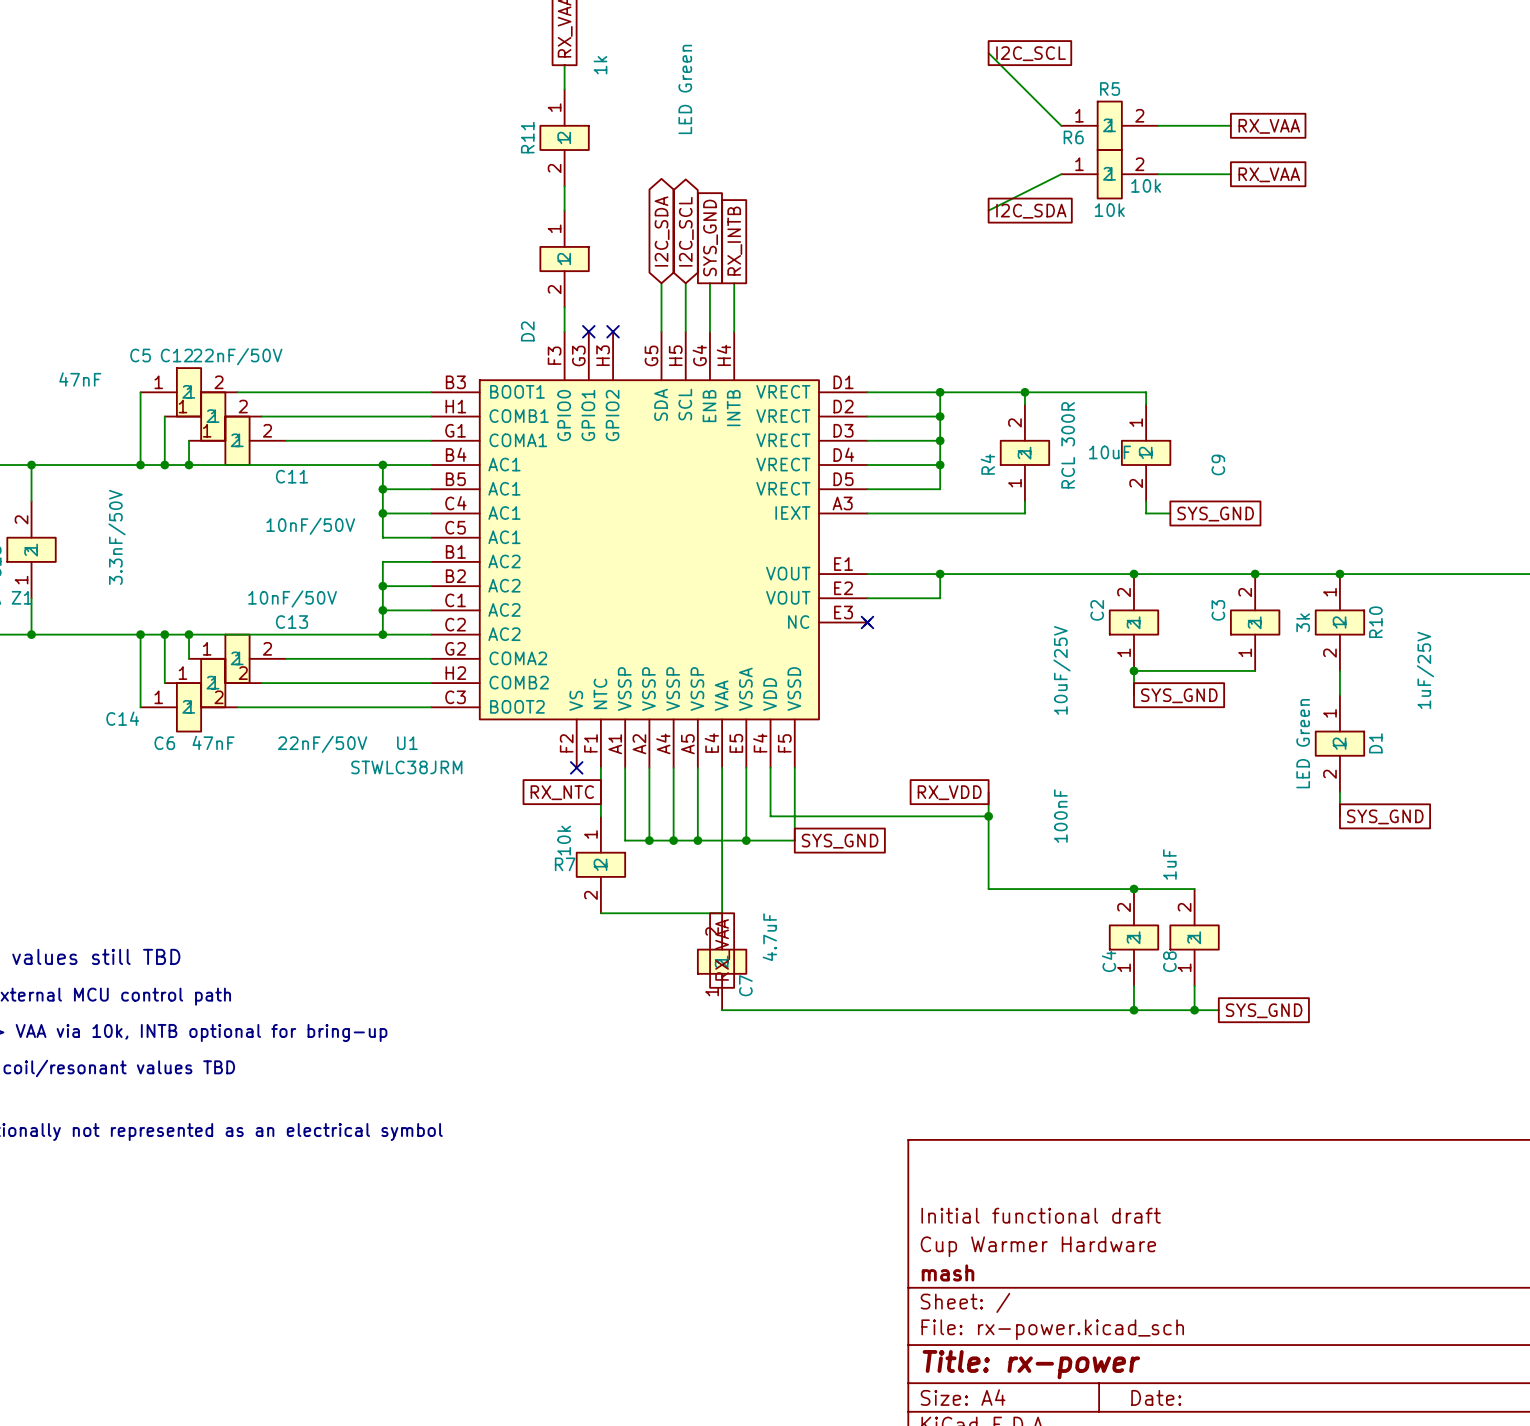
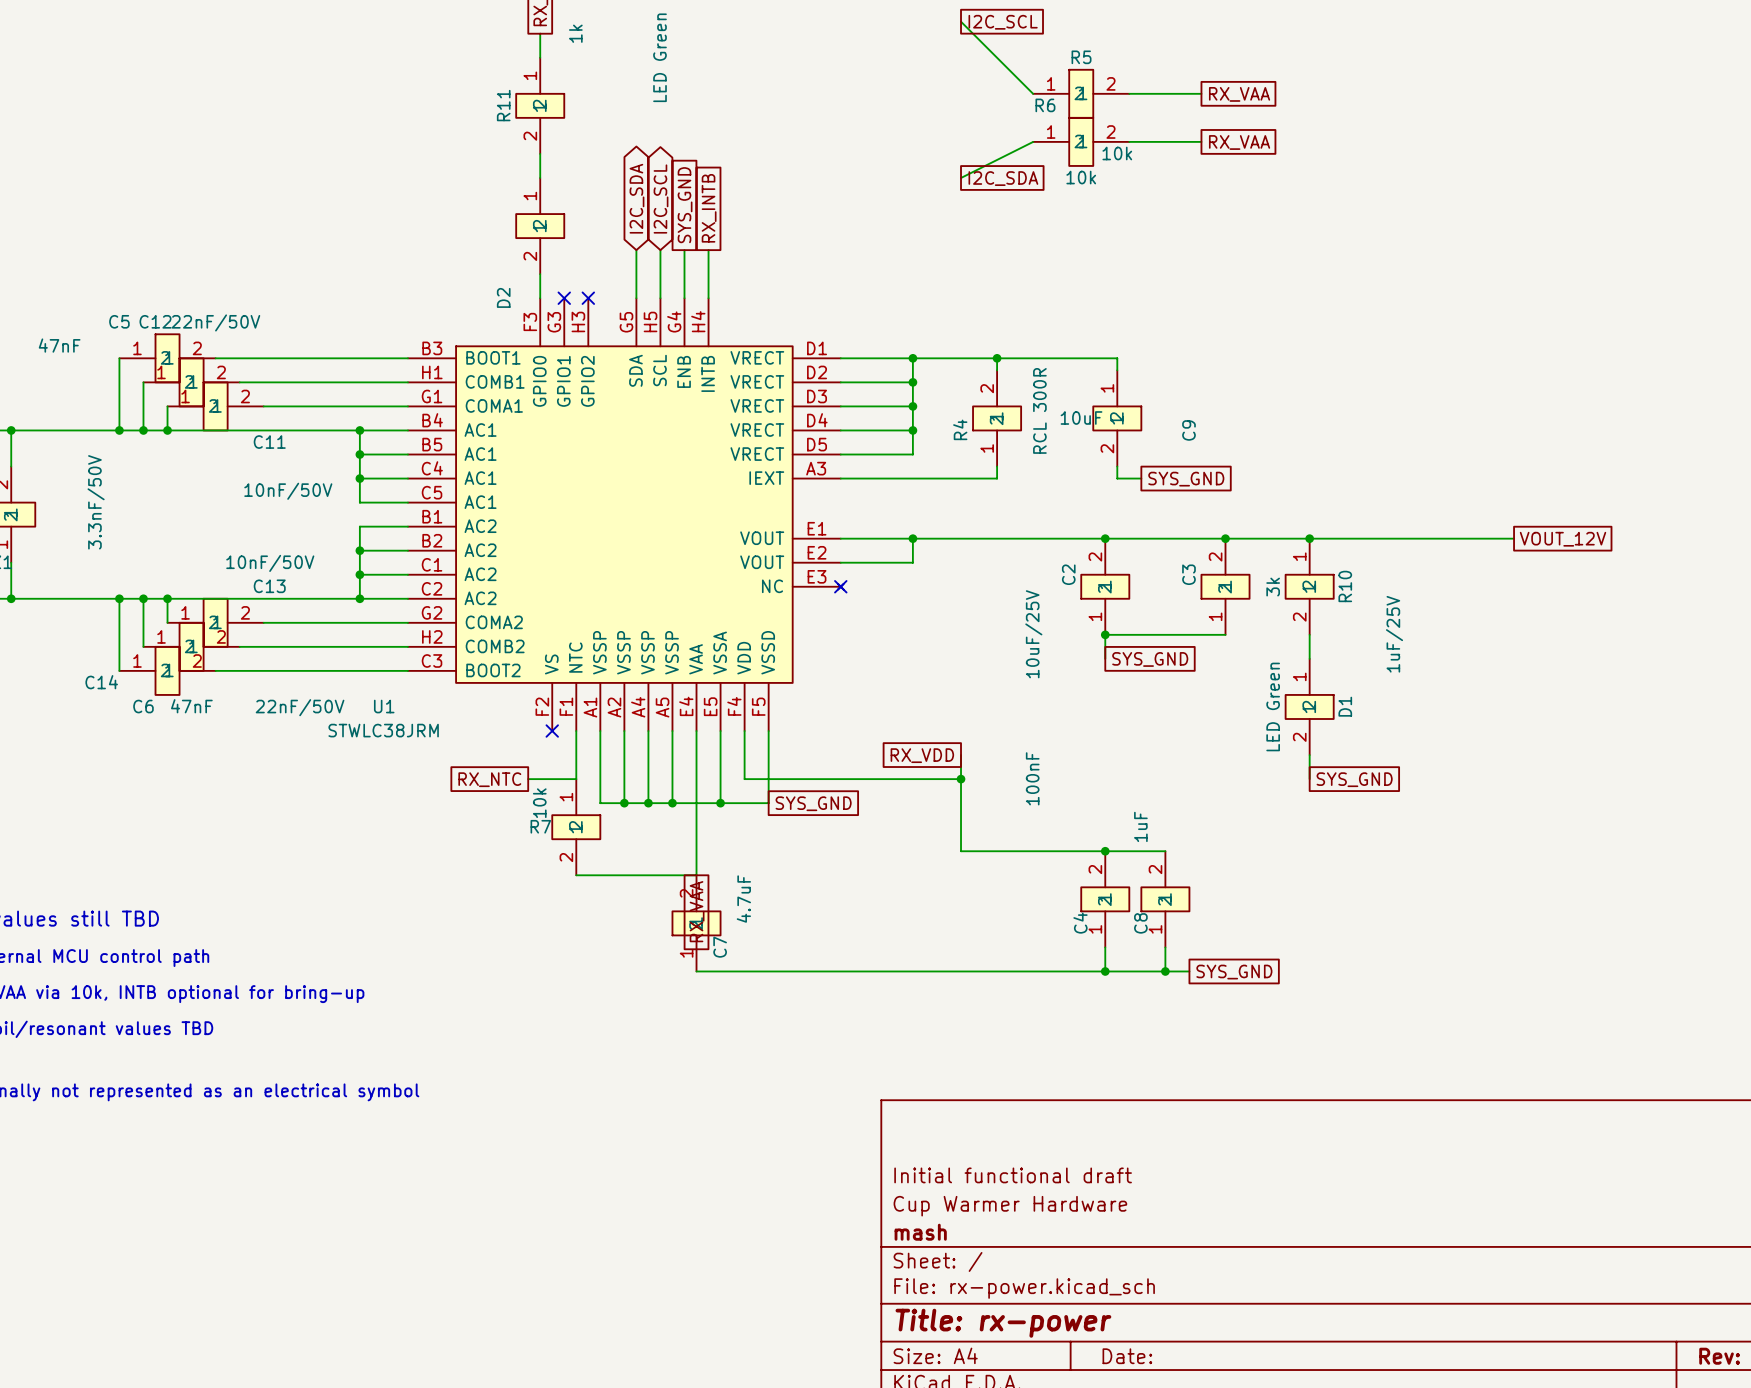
global label position: RX_NTC (562, 792) -> RX_NTC (489, 779)
wire: none -> (528, 779) (576, 779)

